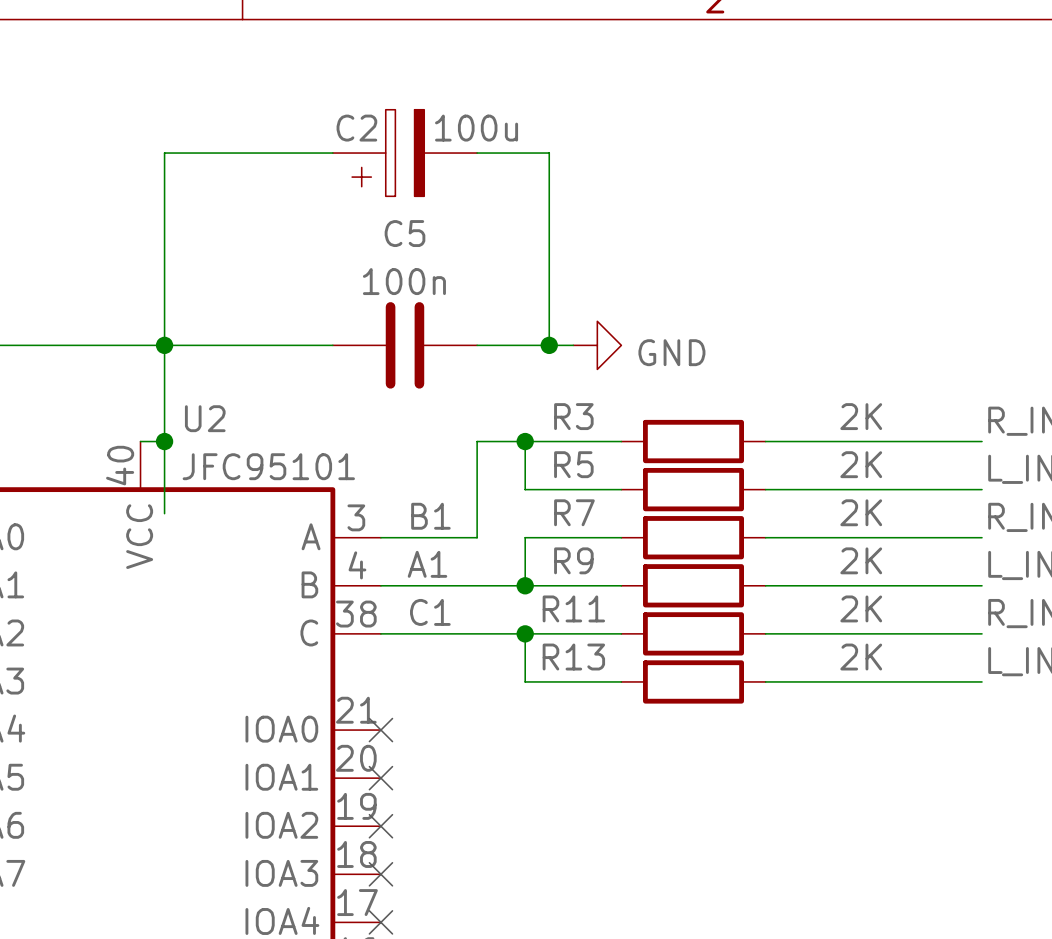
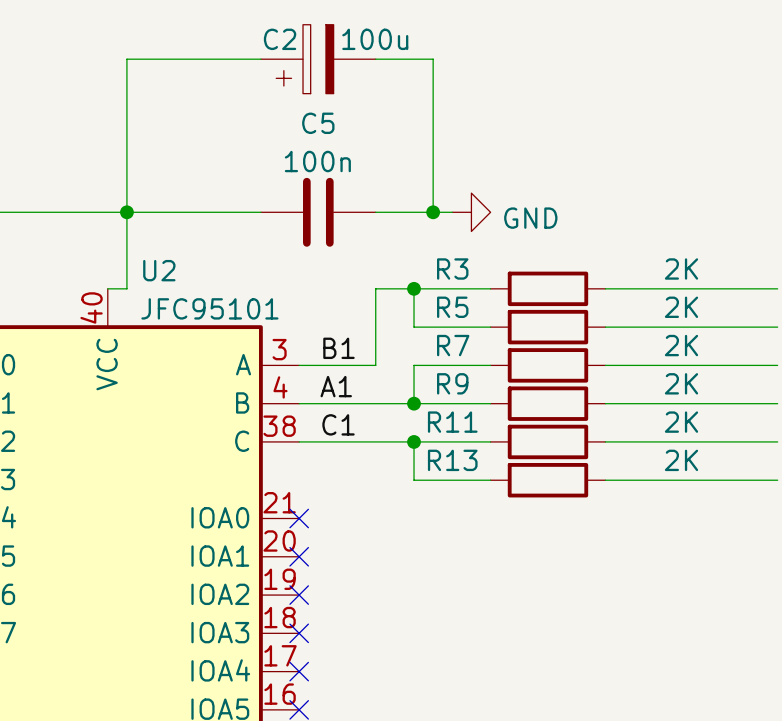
wire: (164, 441) (164, 513) -> none
junction: (164, 441) -> none

